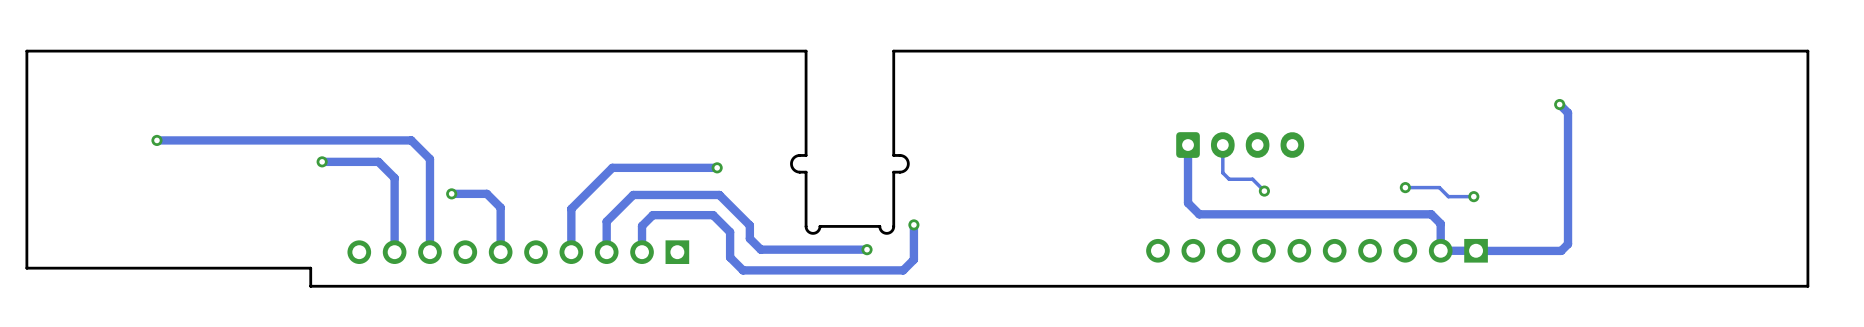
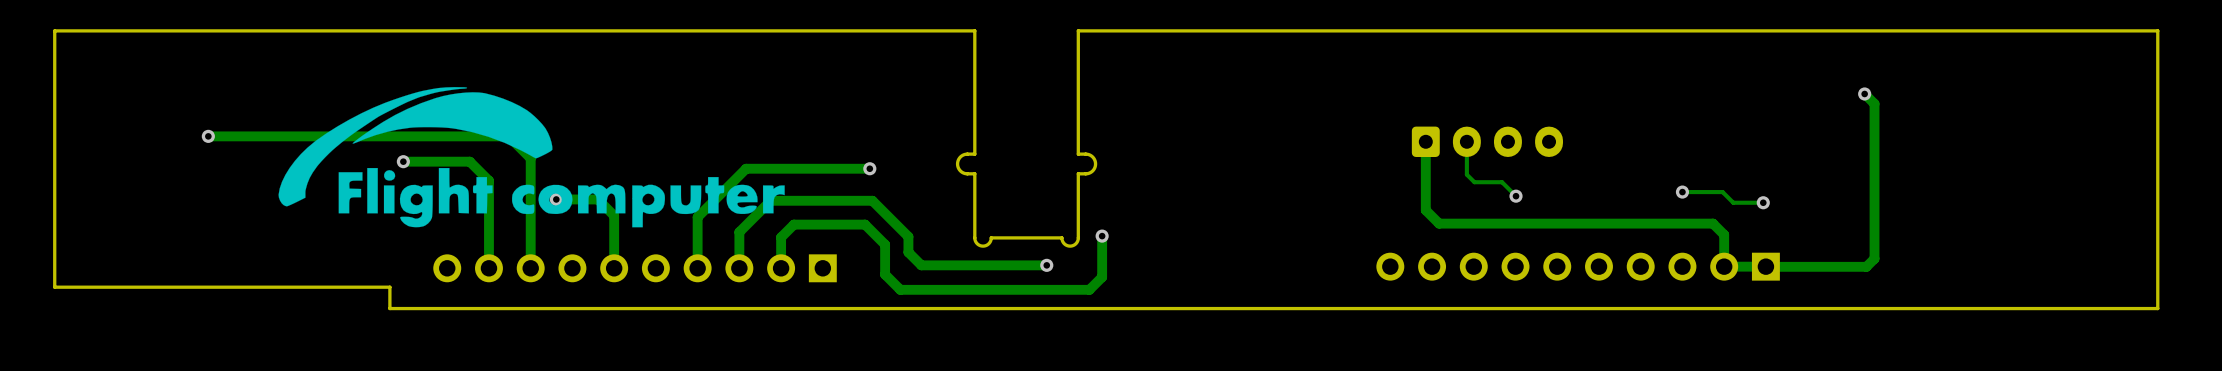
drawing: none -> [278, 87, 785, 228]

